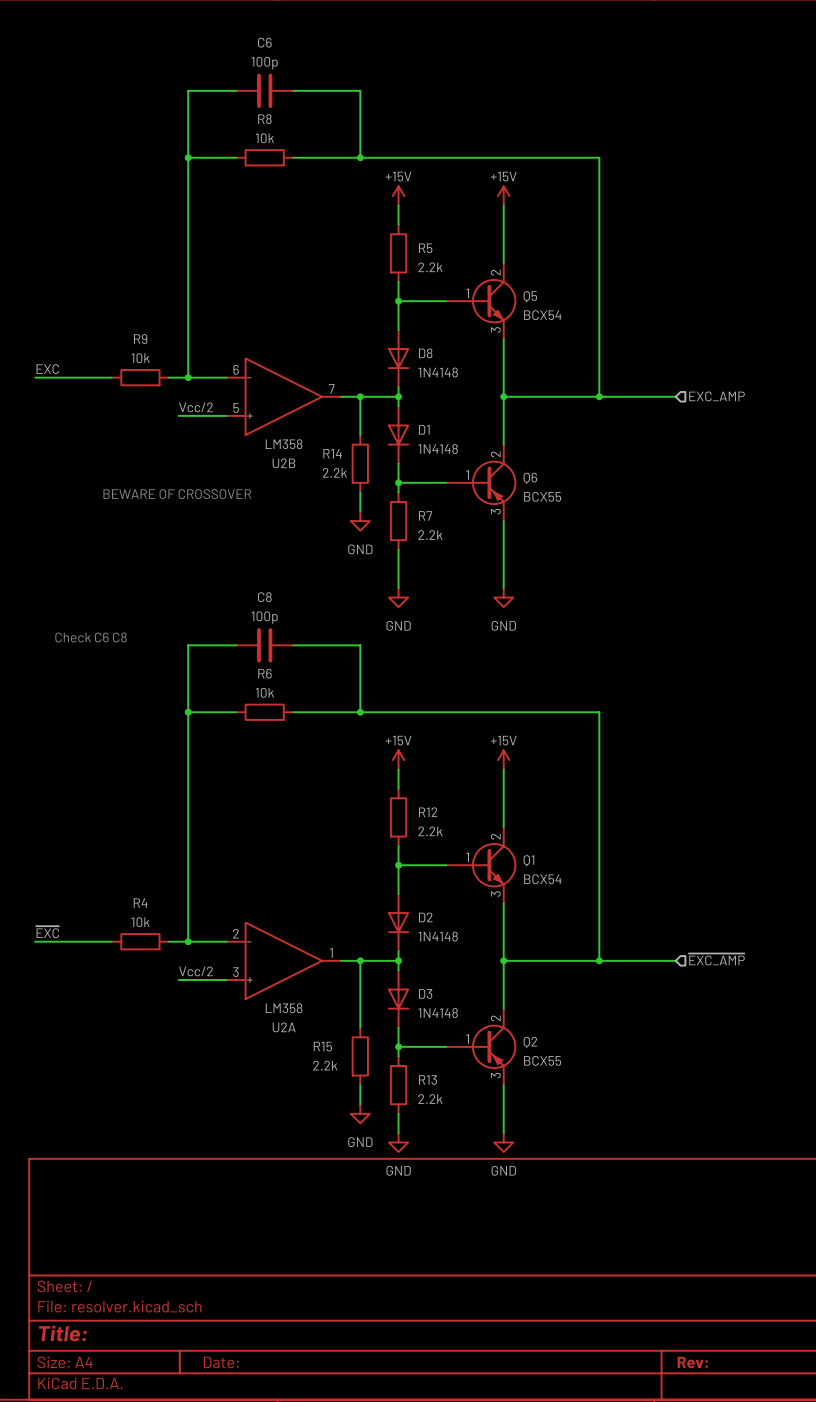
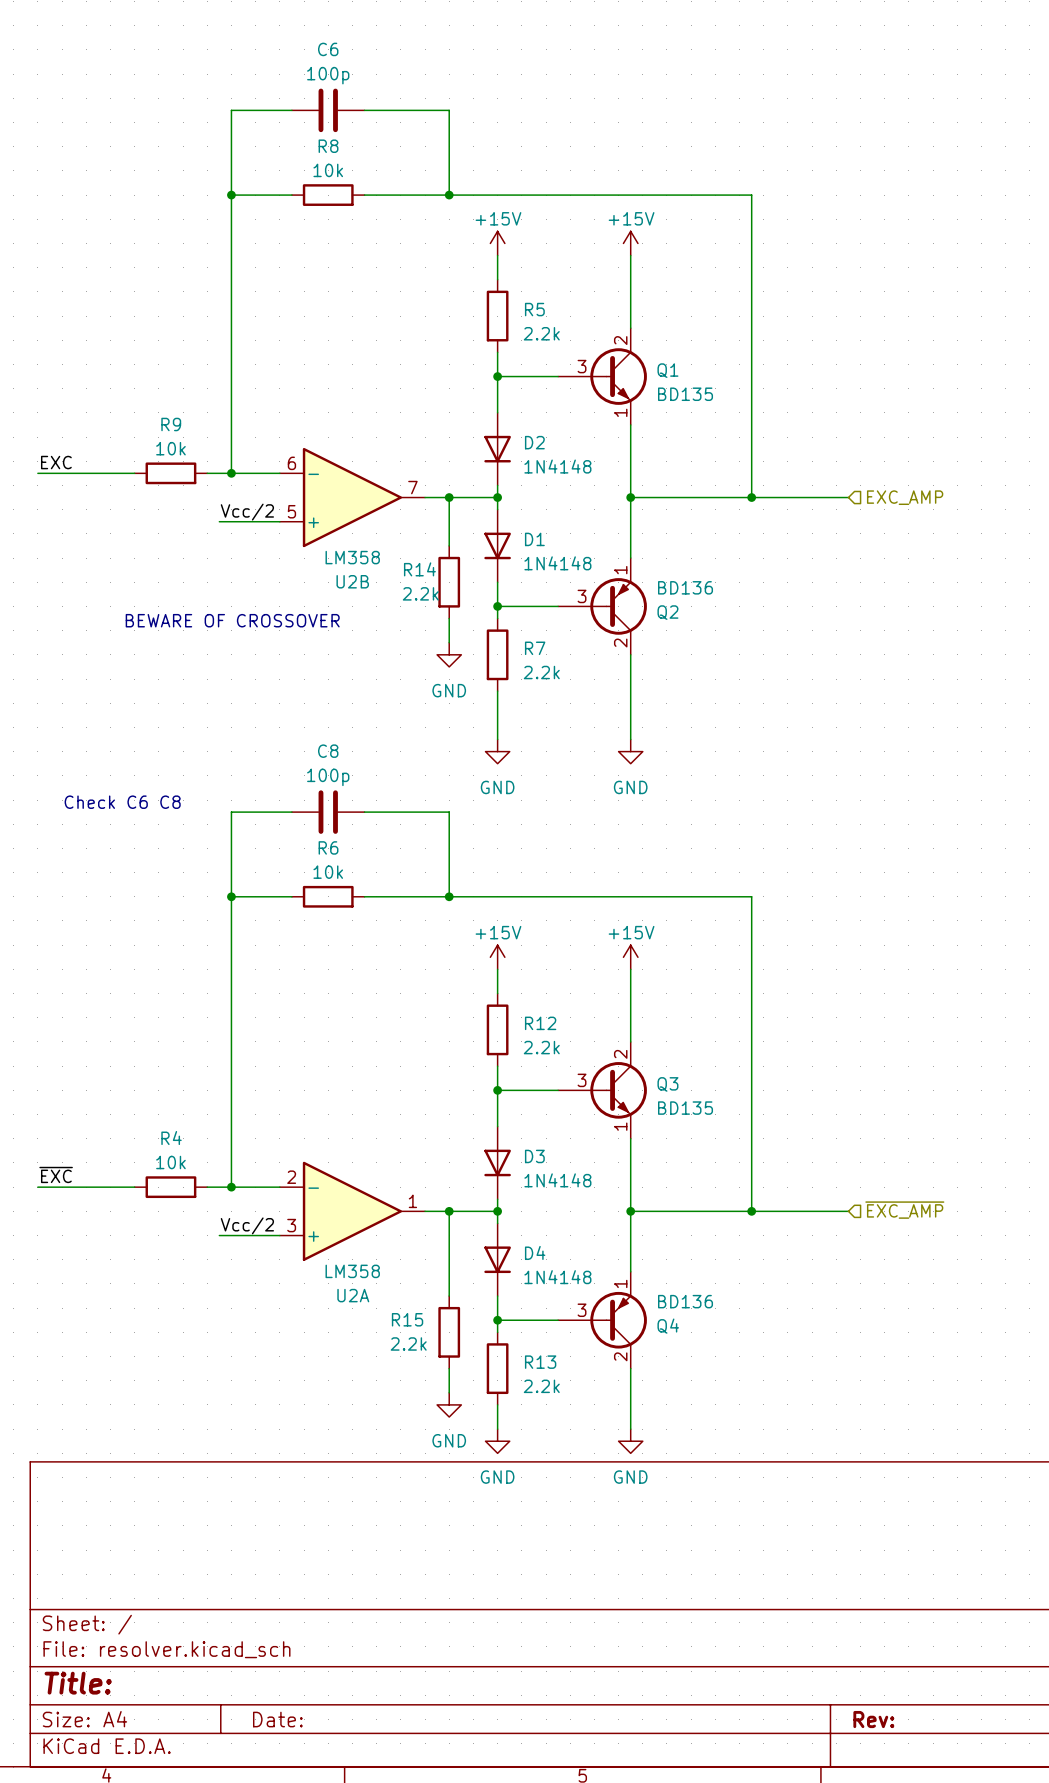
Q5: BCX54 (481, 301) -> none
D8 name: D8 (425, 353) -> D2 (534, 442)
Q6: BCX55 (481, 482) -> none
Q1 symbol: [446, 826, 517, 904] -> [558, 328, 647, 425]
Q3: none -> BD135 (602, 1090)
Q1 value: BCX54 (542, 879) -> BD135 (685, 394)
D2 name: D2 (425, 917) -> D3 (534, 1156)
D3 name: D3 (425, 993) -> D4 (535, 1252)
Q2 symbol: [446, 1008, 517, 1086] -> [558, 558, 647, 655]
Q4: none -> BD136 (602, 1320)
Q2 value: BCX55 (542, 1060) -> BD136 (685, 587)

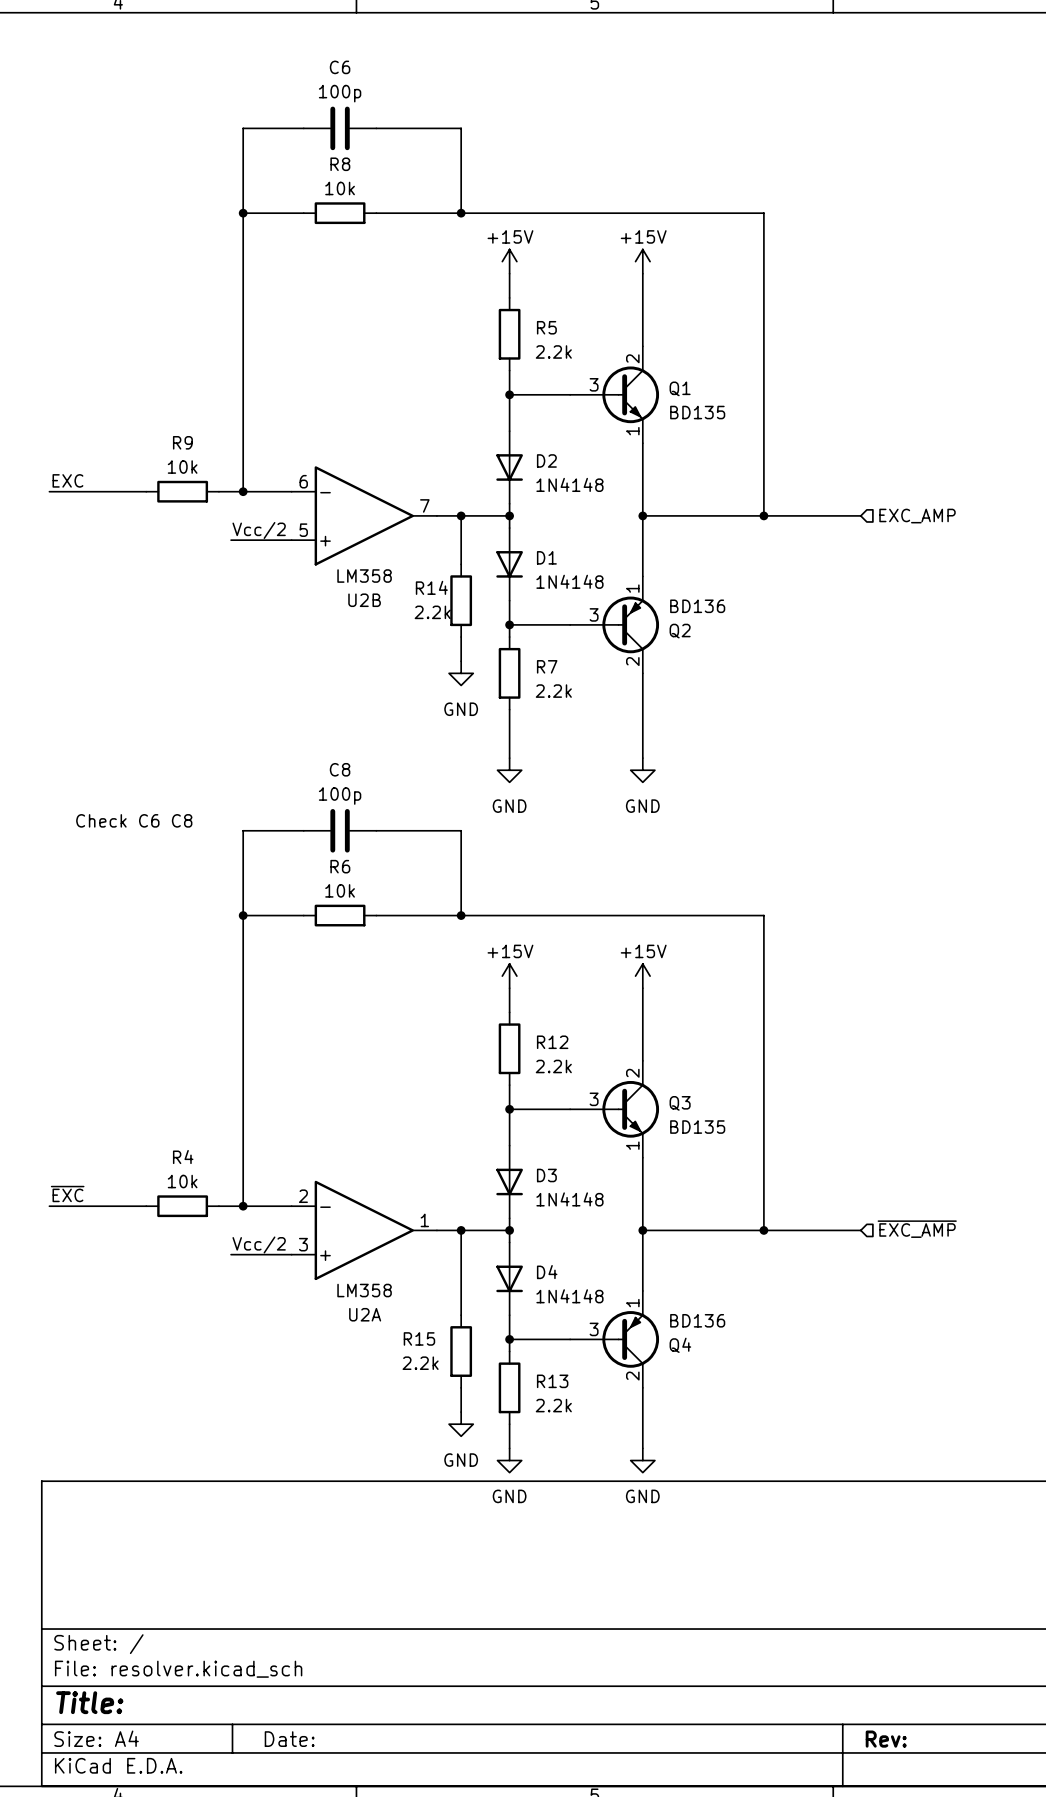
text: BEWARE OF CROSSOVER (232, 620) -> none

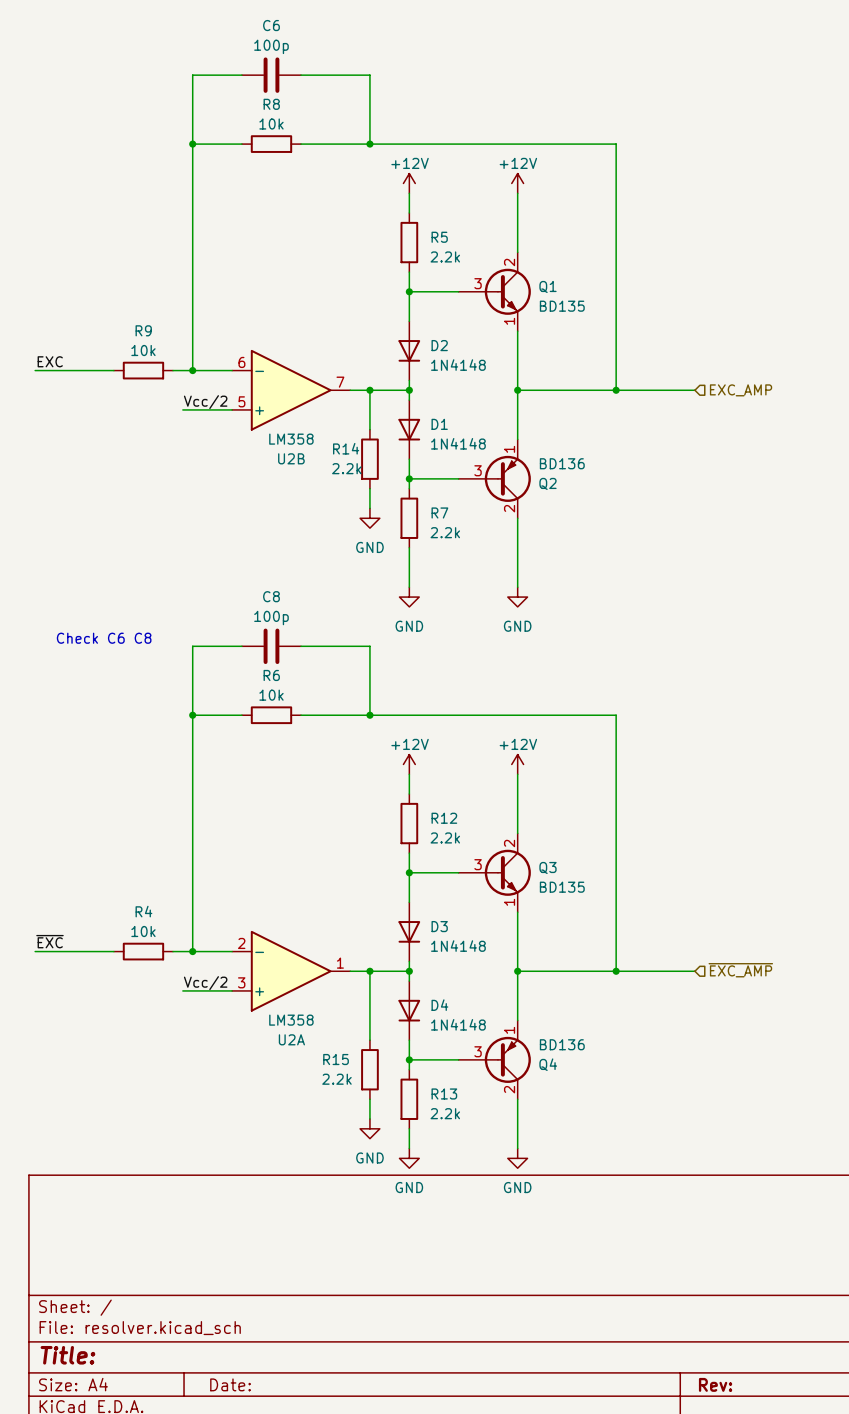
power symbol: +15V (509, 261) -> +12V (409, 183)
power symbol: +15V (642, 261) -> +12V (517, 183)
power symbol: +15V (509, 976) -> +12V (409, 764)
power symbol: +15V (642, 976) -> +12V (517, 764)

